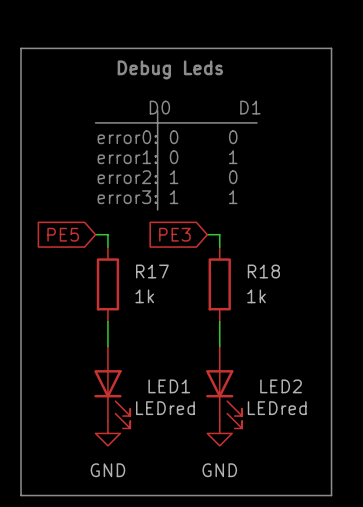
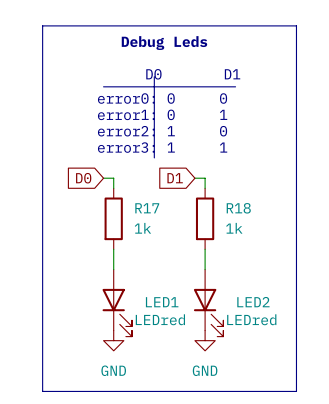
global label: PE5 (63, 234) -> D0 (83, 178)
global label: PE3 (174, 234) -> D1 (175, 178)

